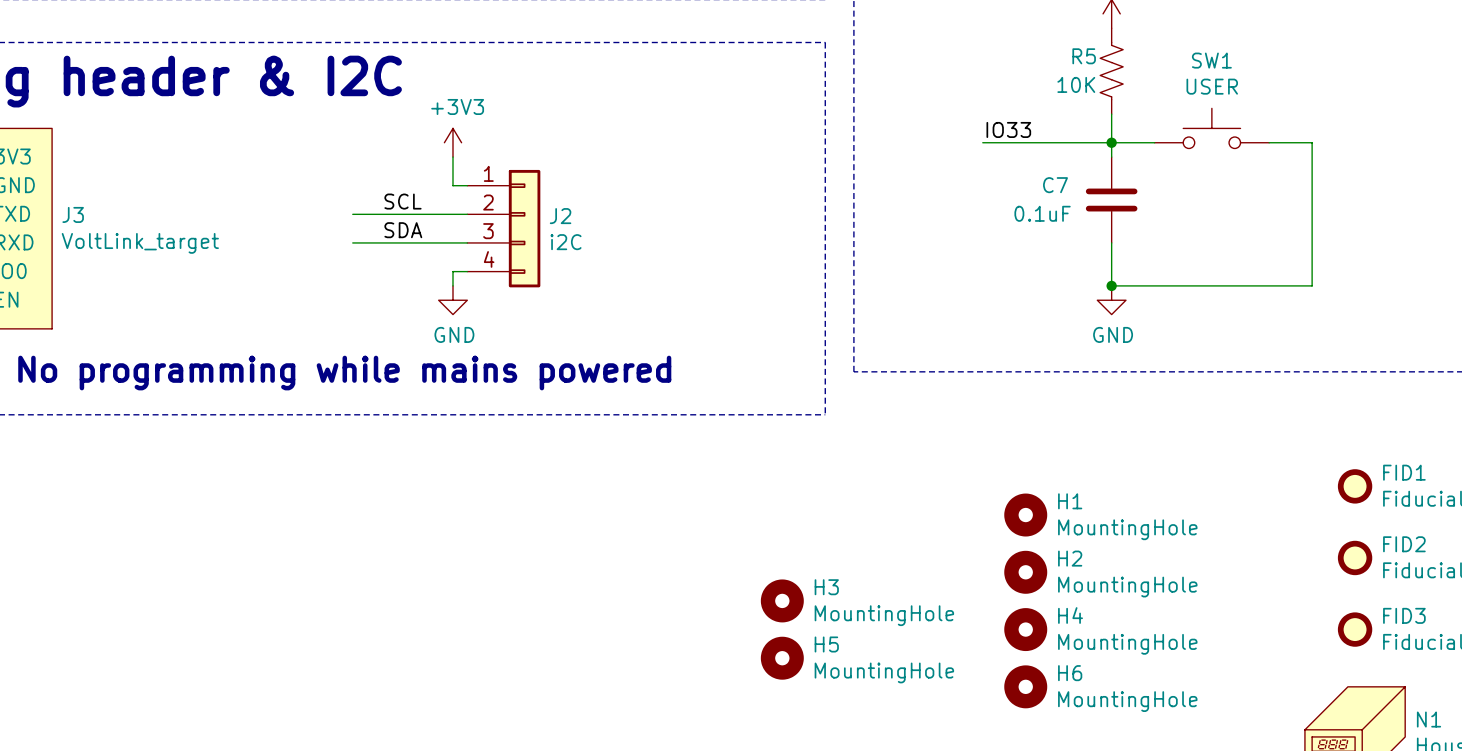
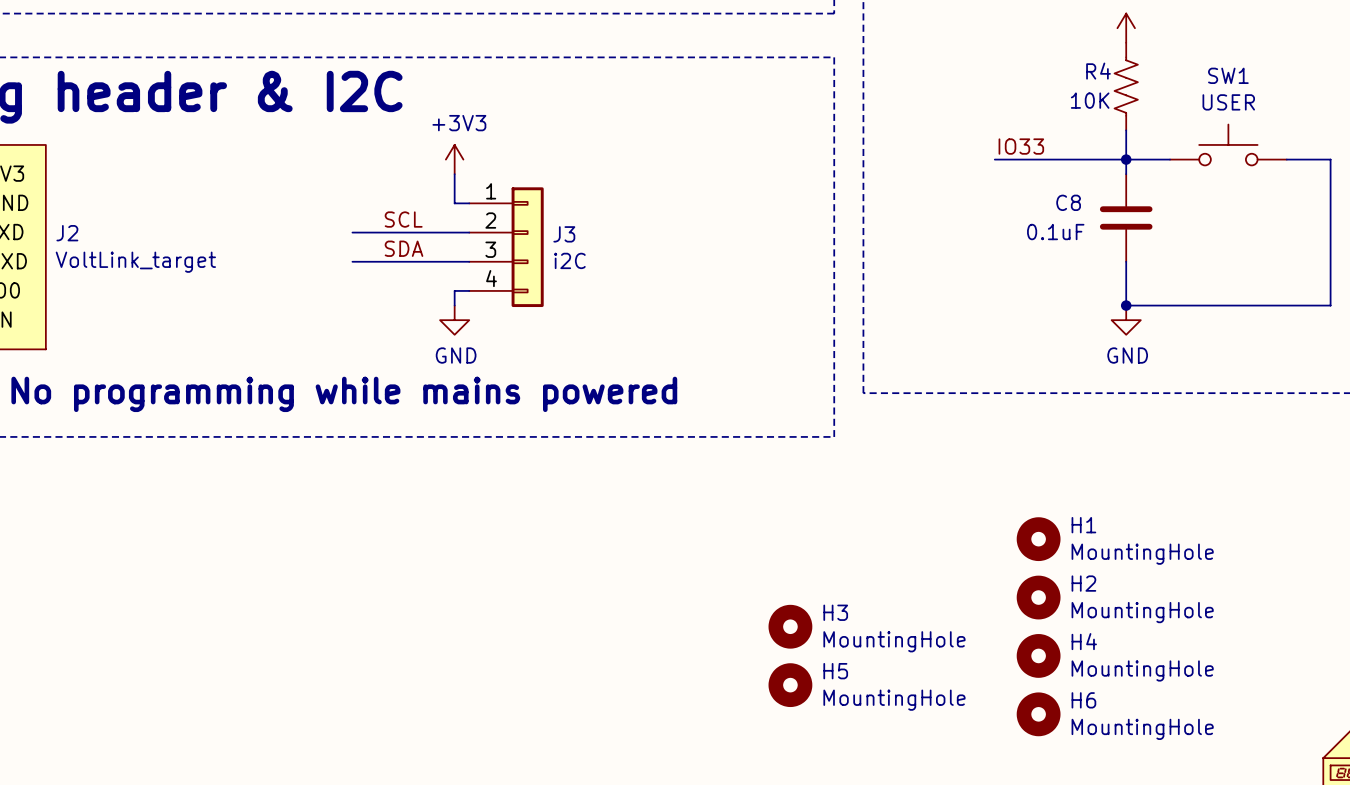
R5 name: R5 (1084, 56) -> R4 (1098, 71)
C7 name: C7 (1055, 185) -> C8 (1068, 202)
J3 name: J3 (73, 214) -> J2 (67, 233)
J2 name: J2 (560, 216) -> J3 (564, 234)

